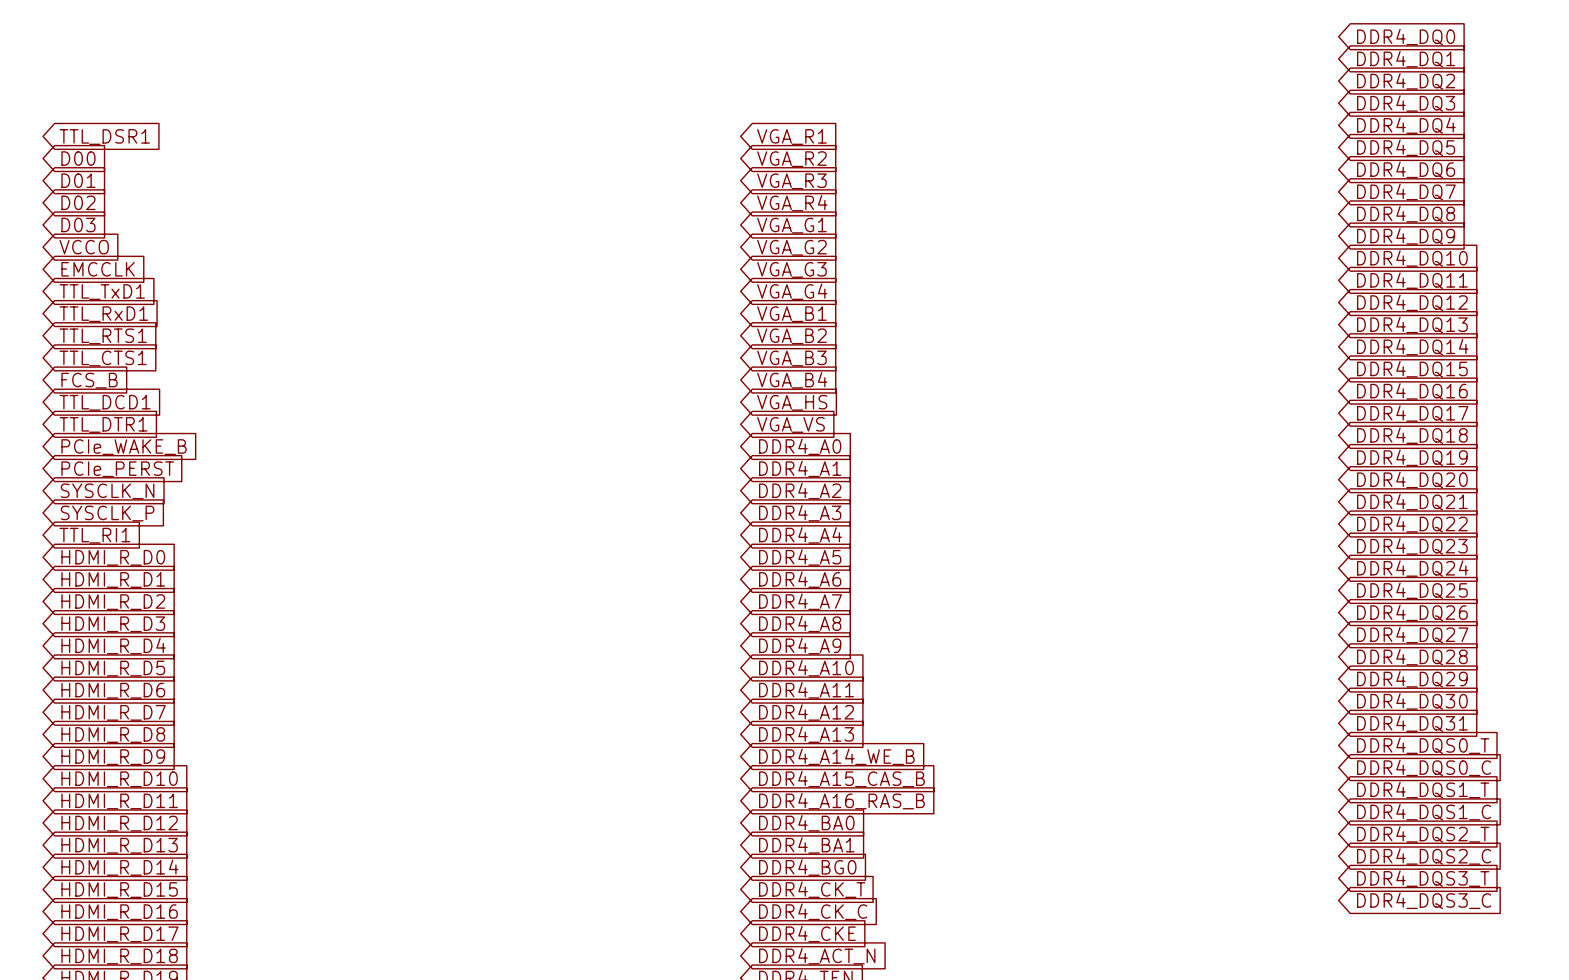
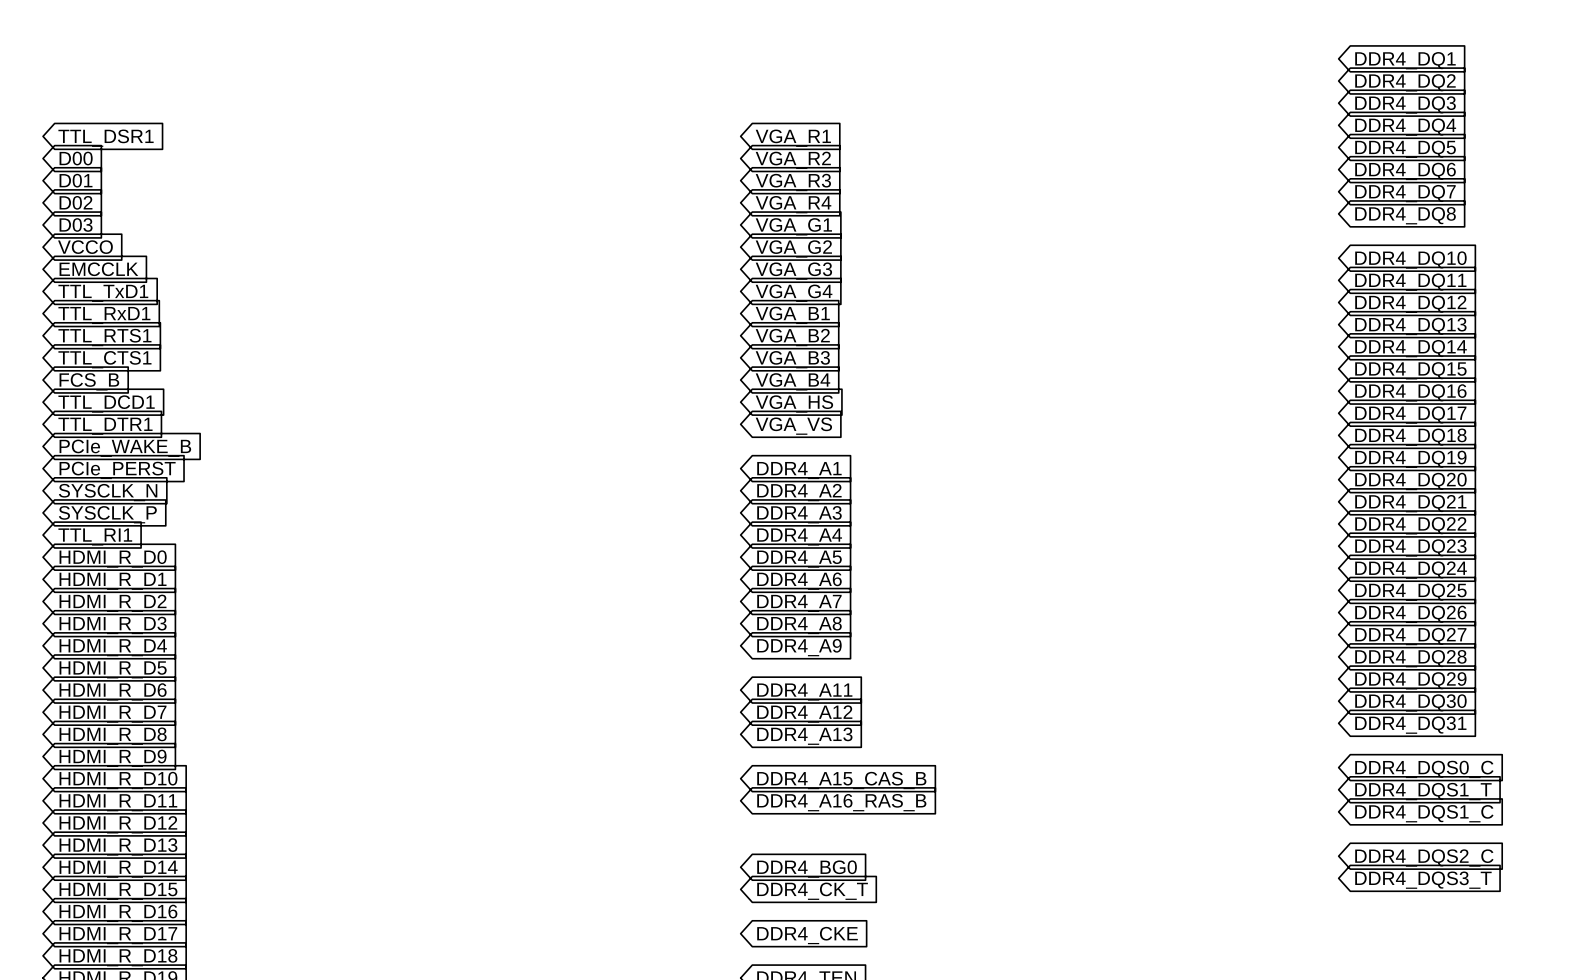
global label: DDR4_DQ0 (1406, 37) -> none
global label: DDR4_DQ9 (1406, 236) -> none
global label: DDR4_A0 (800, 446) -> none
global label: DDR4_A10 (806, 668) -> none
global label: DDR4_DQS0_T (1423, 745) -> none
global label: DDR4_A14_WE_B (836, 756) -> none
global label: DDR4_BA0 (806, 823) -> none
global label: DDR4_DQS2_T (1423, 834) -> none
global label: DDR4_BA1 (806, 845) -> none
global label: DDR4_DQS3_C (1424, 900) -> none
global label: DDR4_CK_C (813, 911) -> none
global label: DDR4_ACT_N (817, 956) -> none

